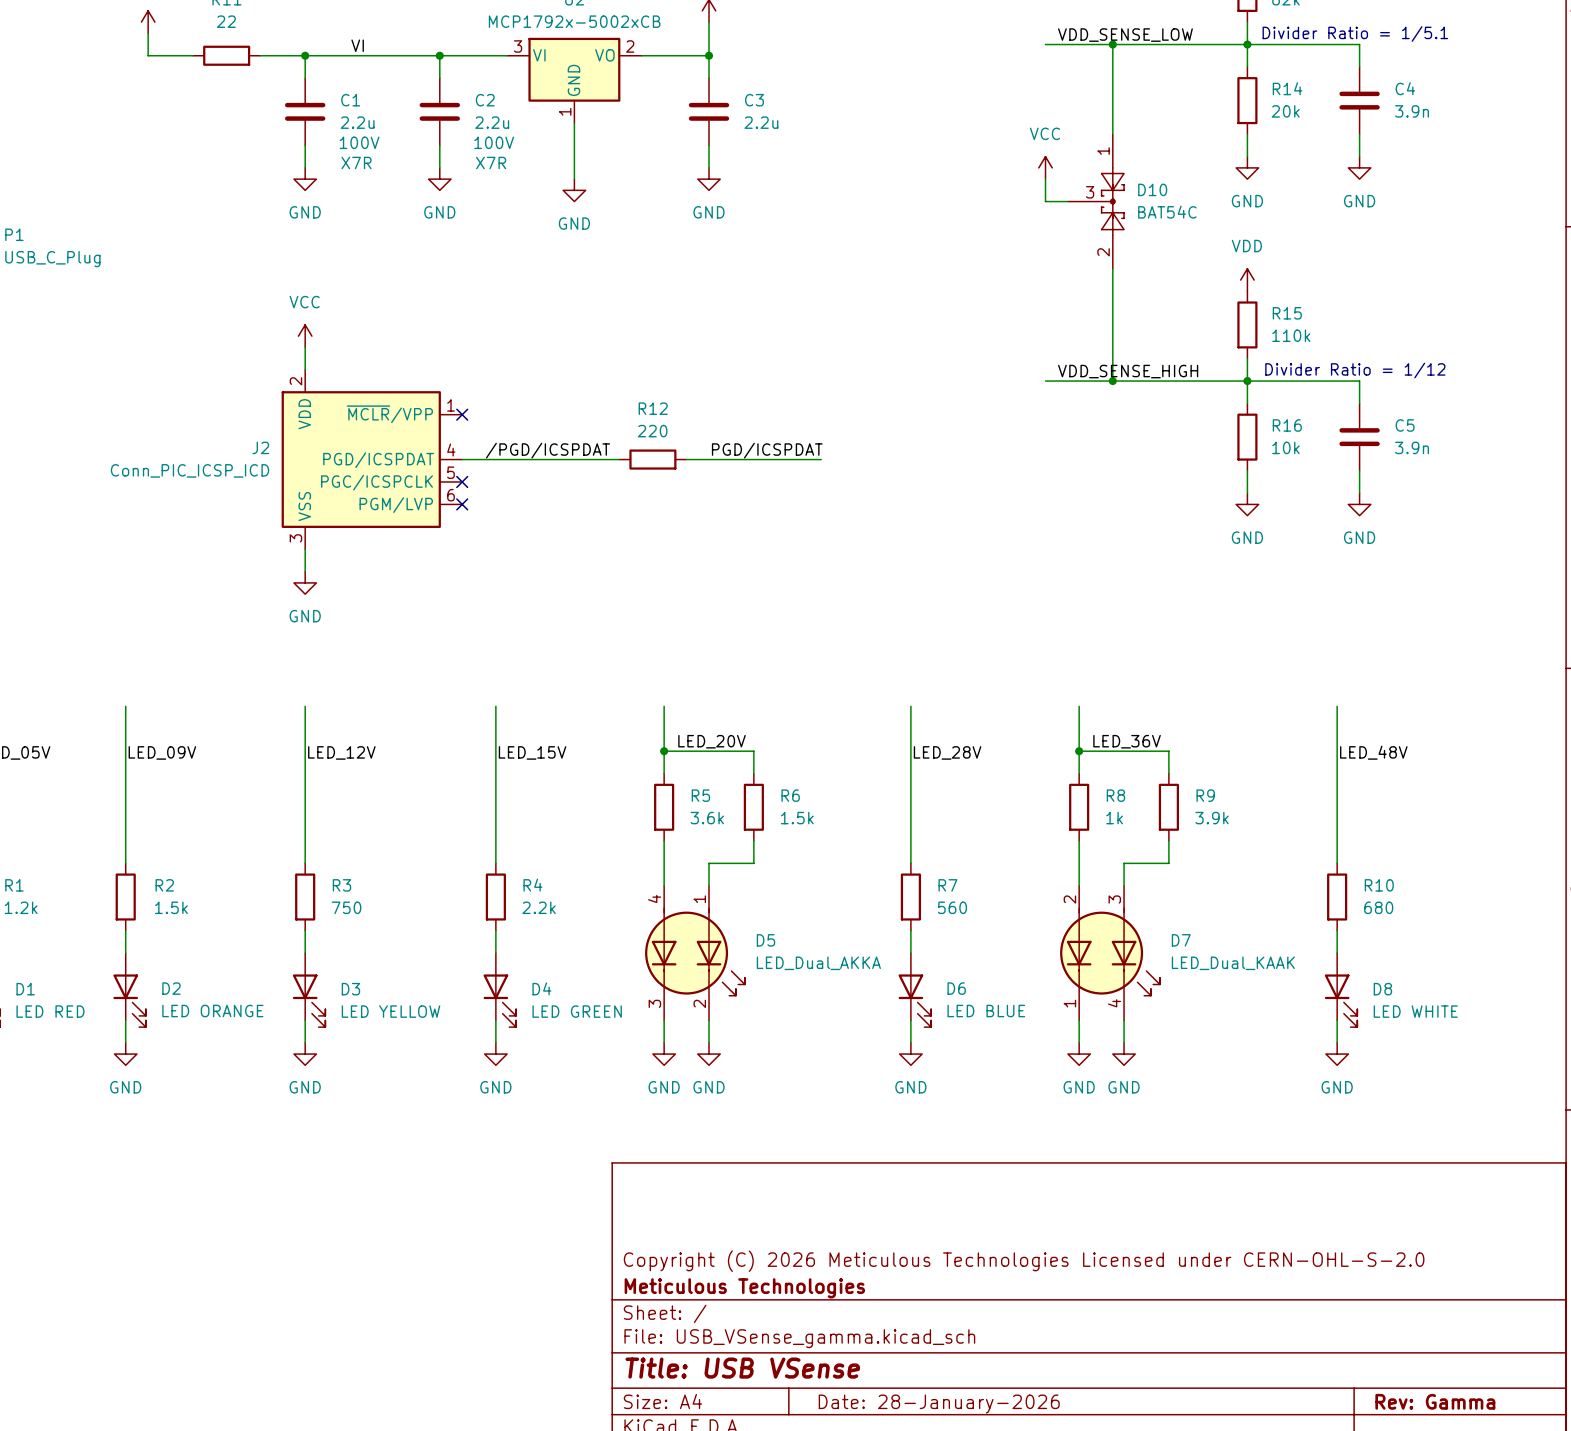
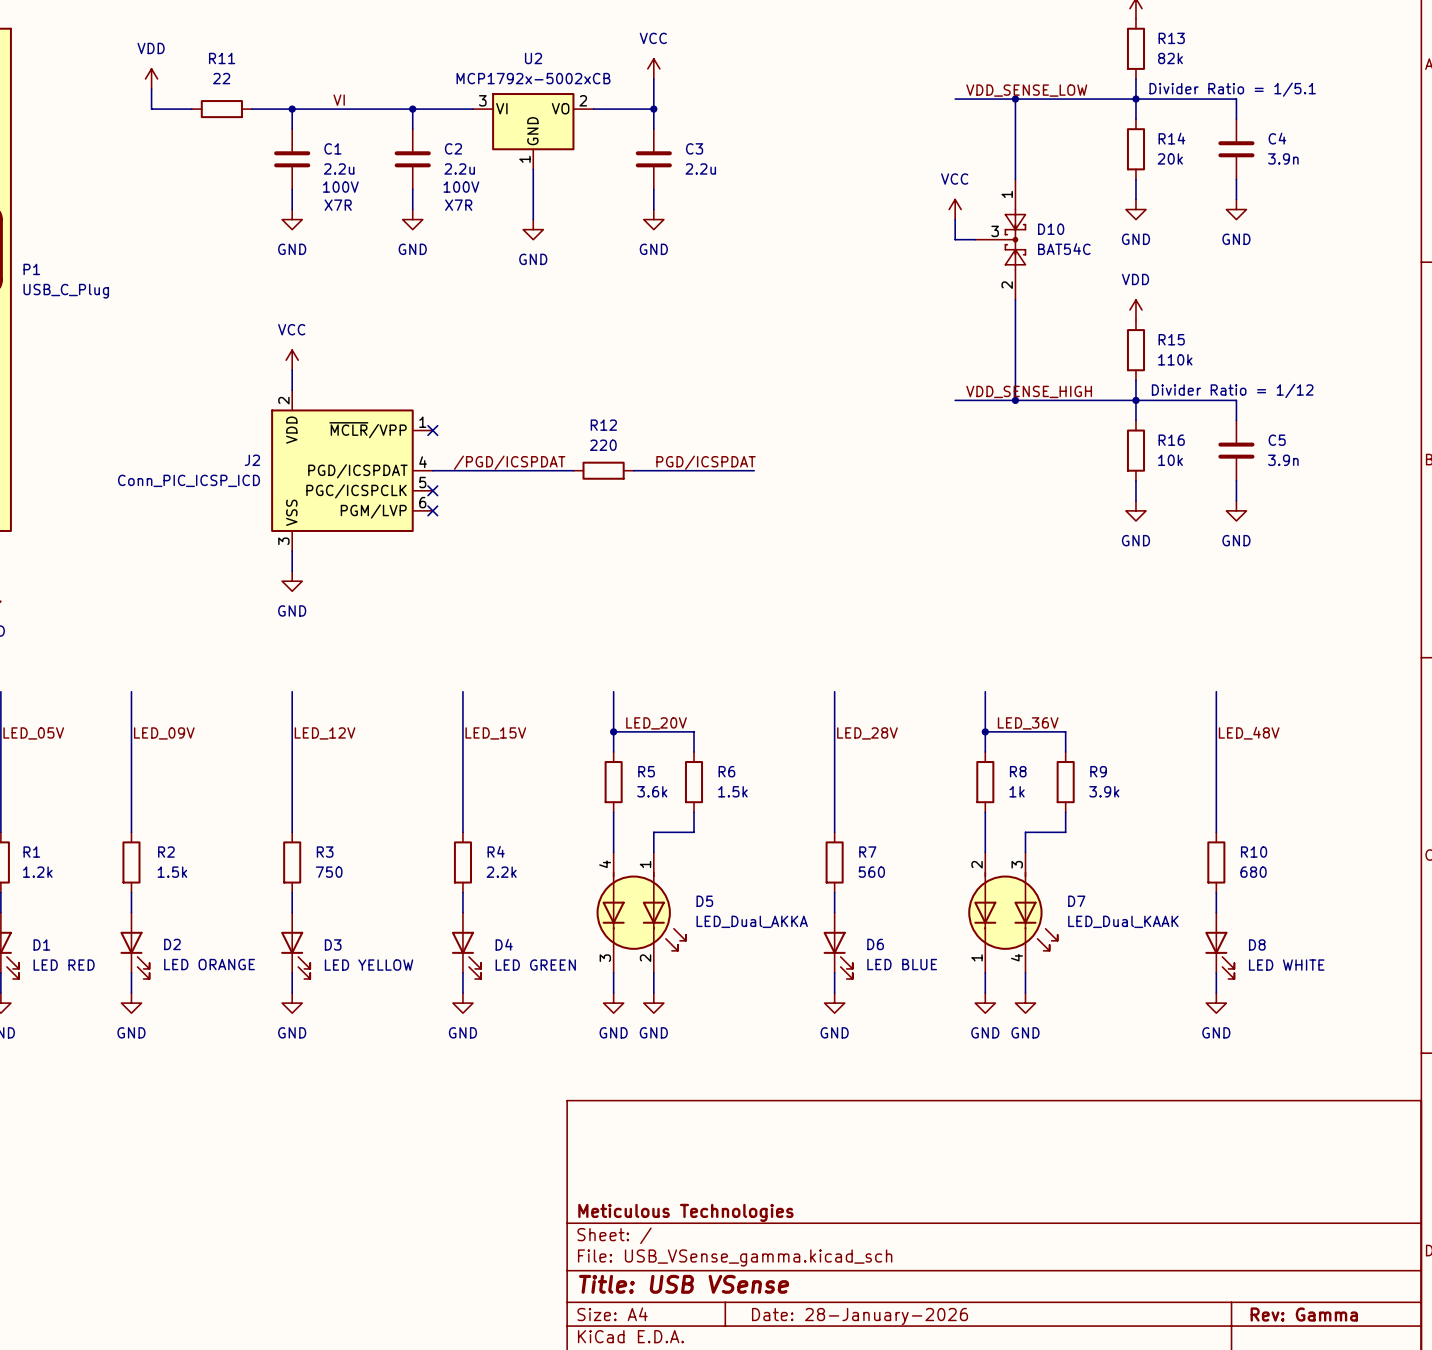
title block: Copyright (C) 2026 Meticulous Technologies Licensed under CERN-OHL-S-2.0 (1024, 1261) -> none

